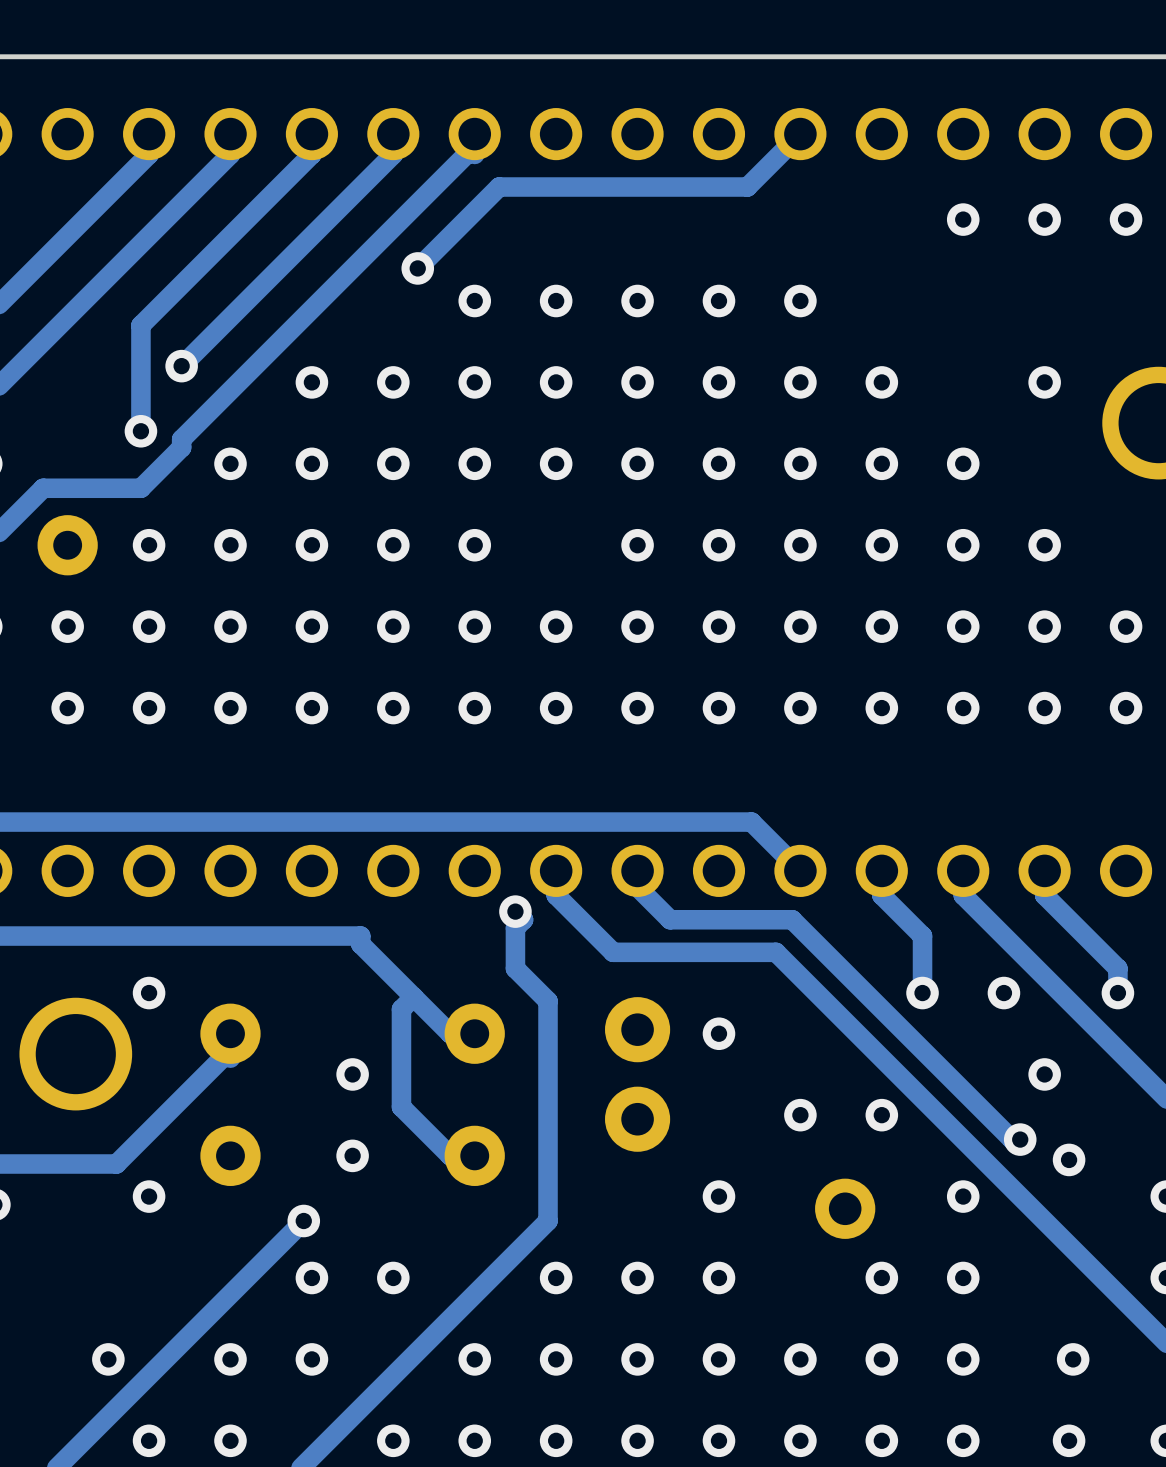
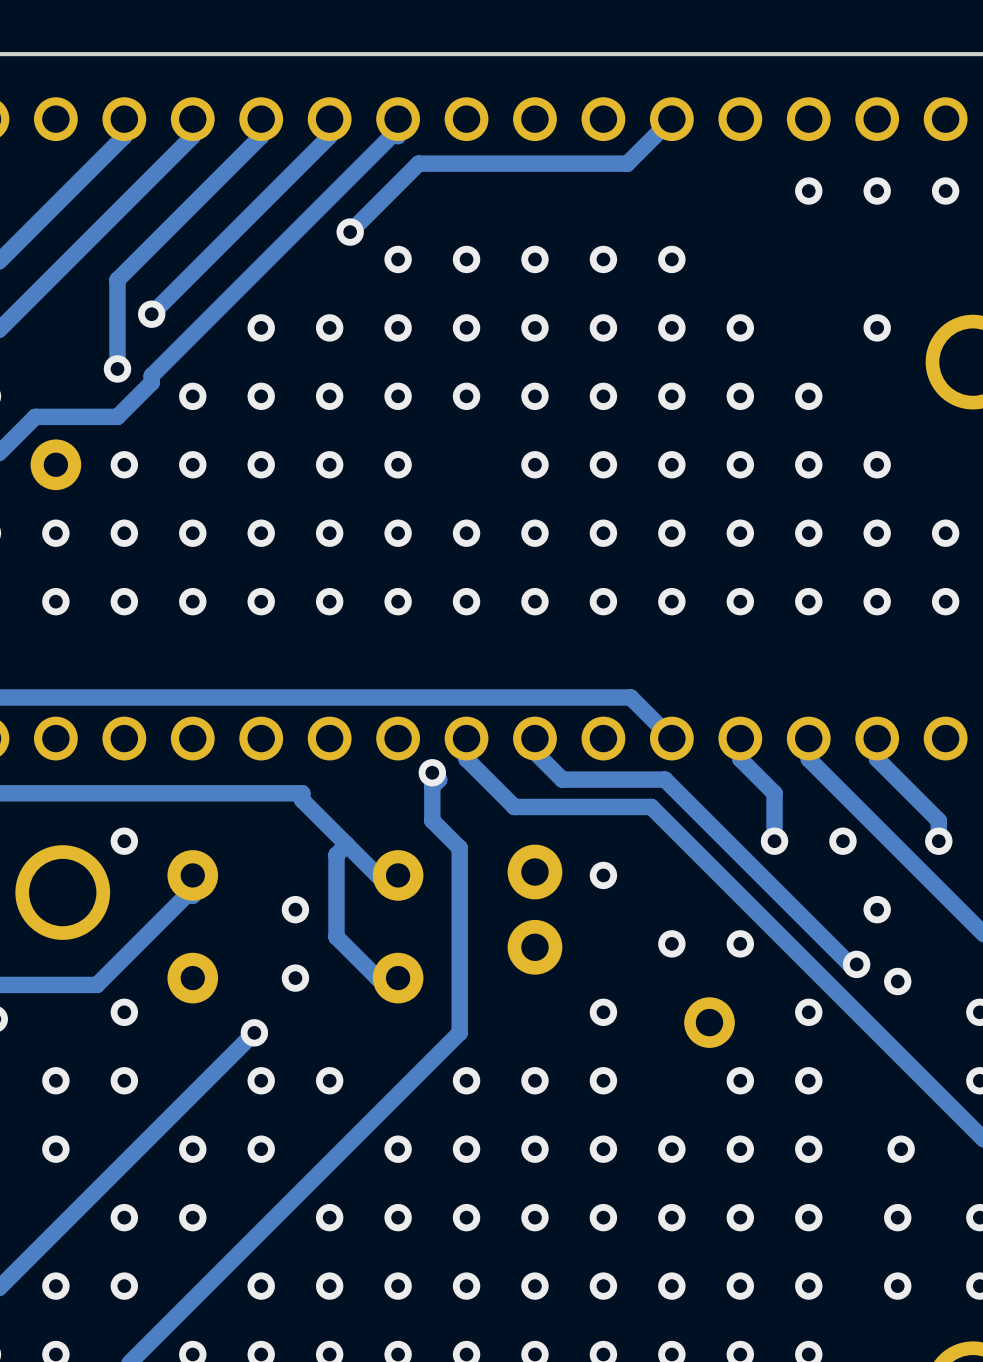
via: none -> (55, 1080)
via: none -> (124, 1080)
via position: (108, 1359) -> (55, 1149)

